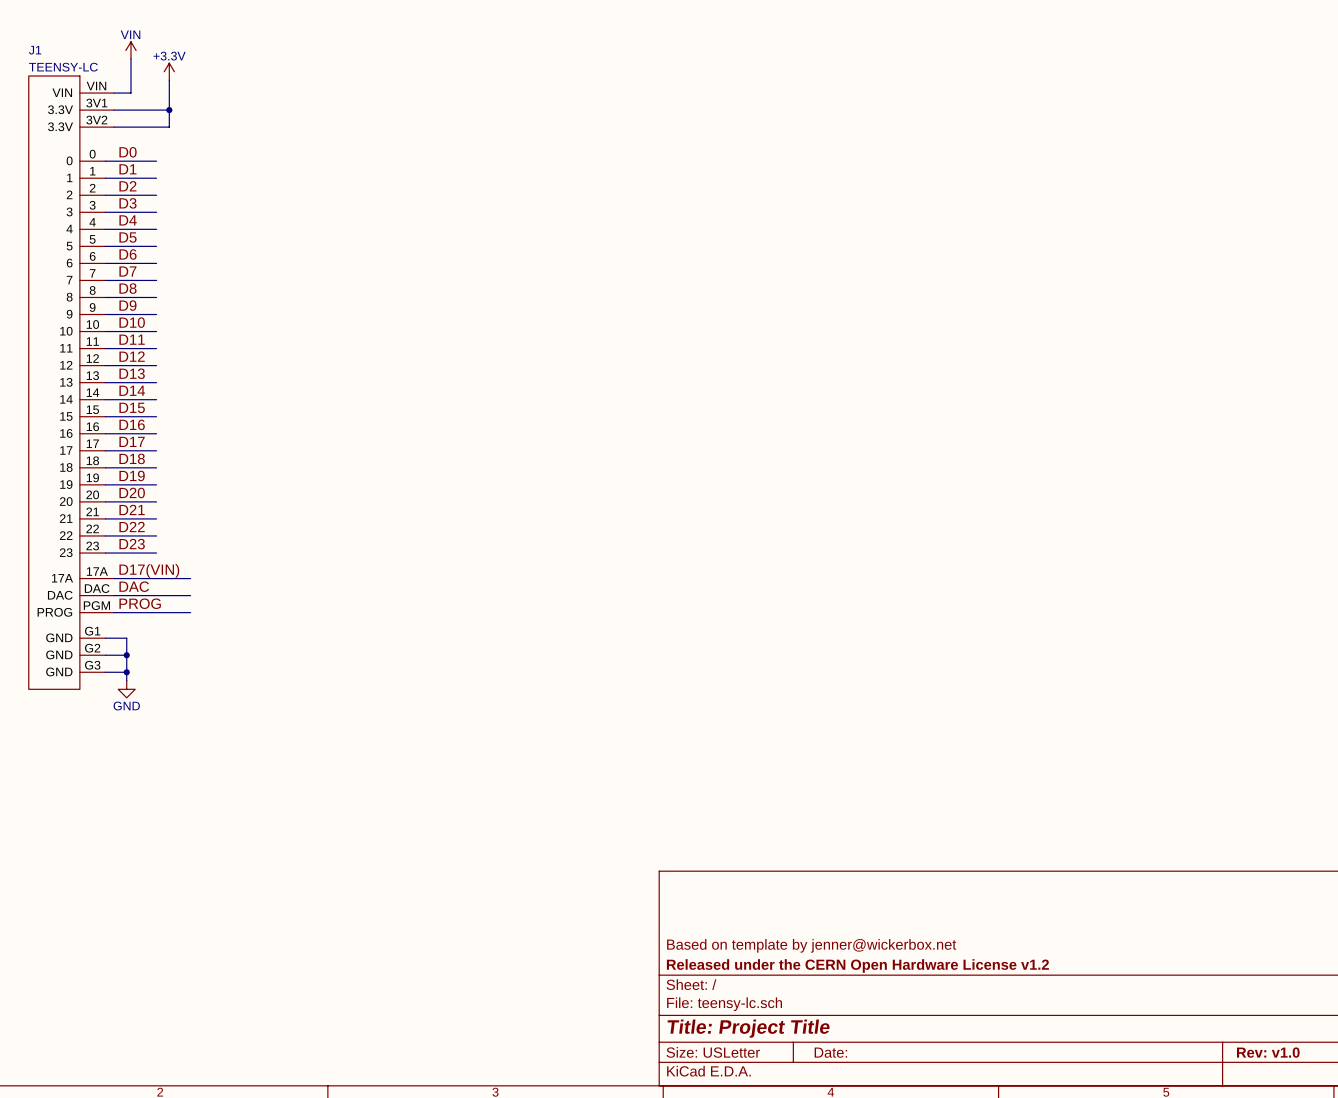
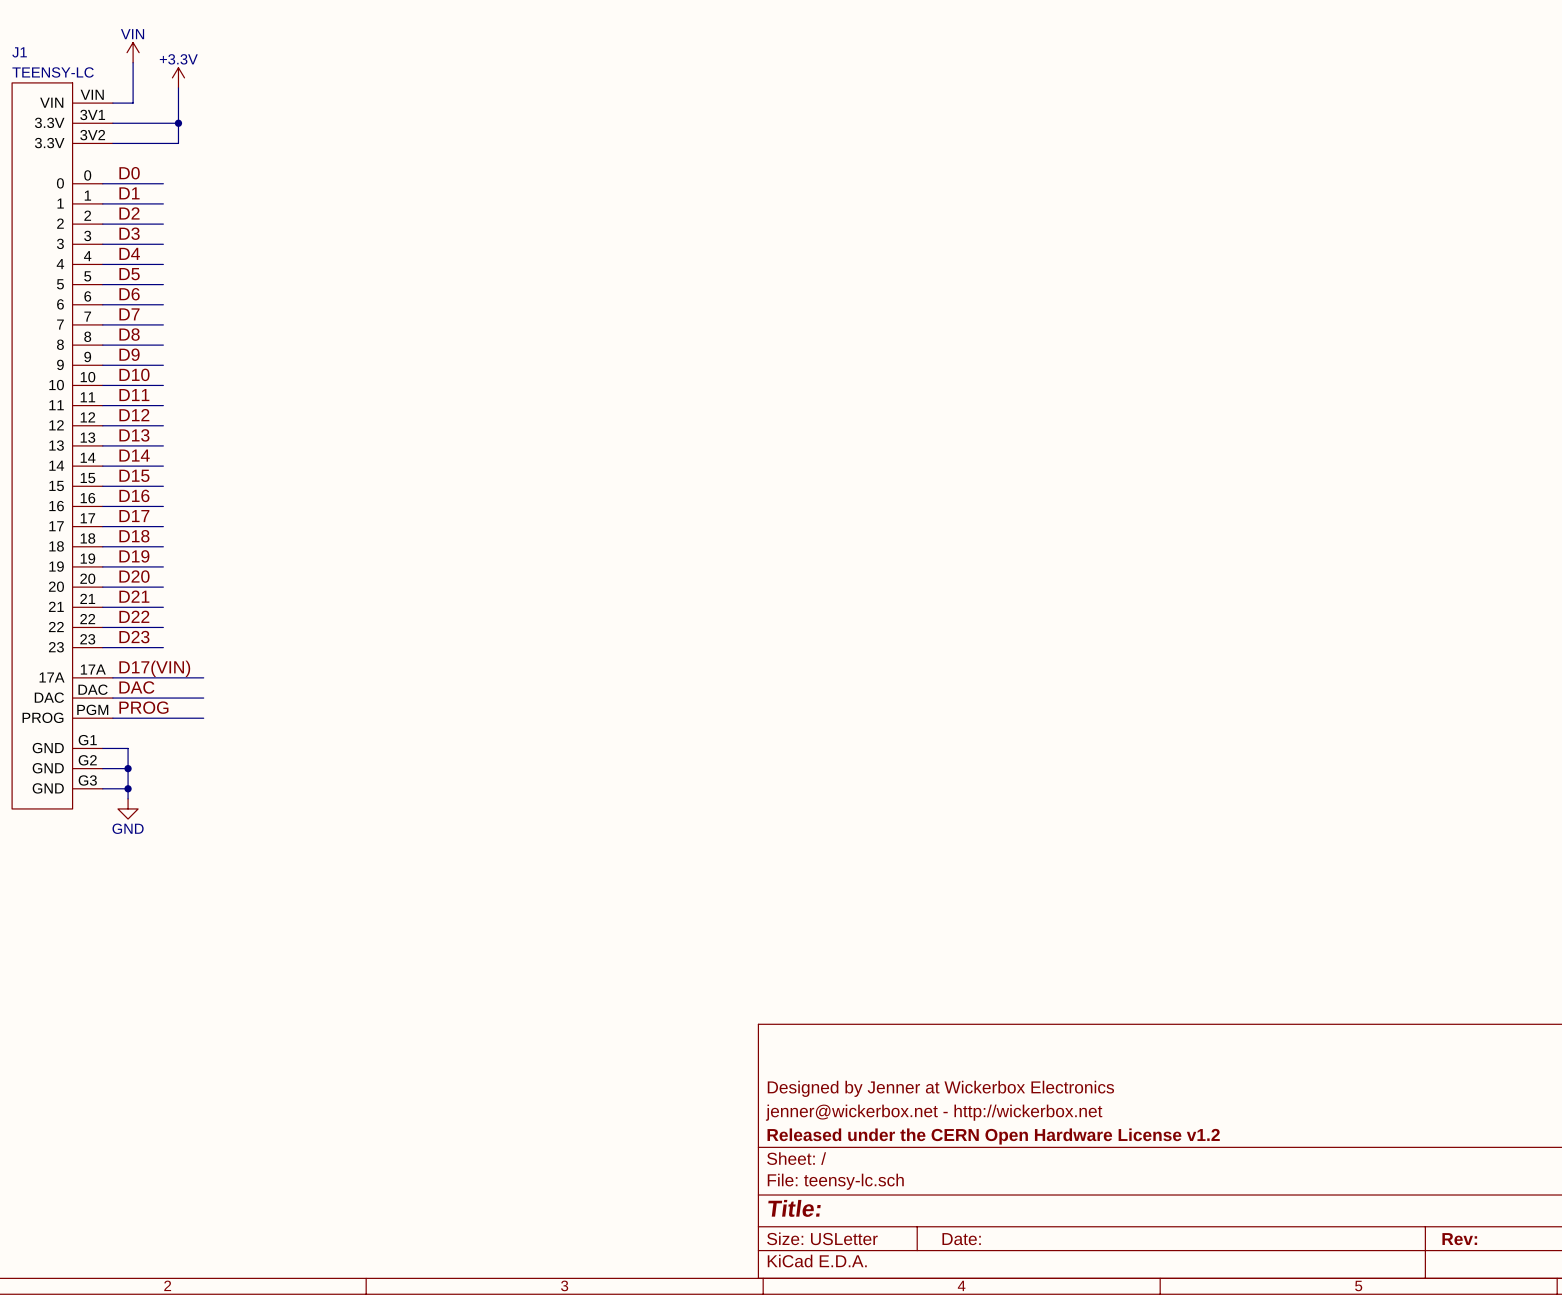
title block: none -> Designed by Jenner at Wickerbox Electronics (940, 1088)
title block: Based on template by jenner@wickerbox.net (811, 945) -> jenner@wickerbox.net - http://wickerbox.net (934, 1112)
title block: Title: Project Title (748, 1028) -> Title: (794, 1208)
title block: Rev: v1.0 (1268, 1052) -> Rev: (1459, 1239)

